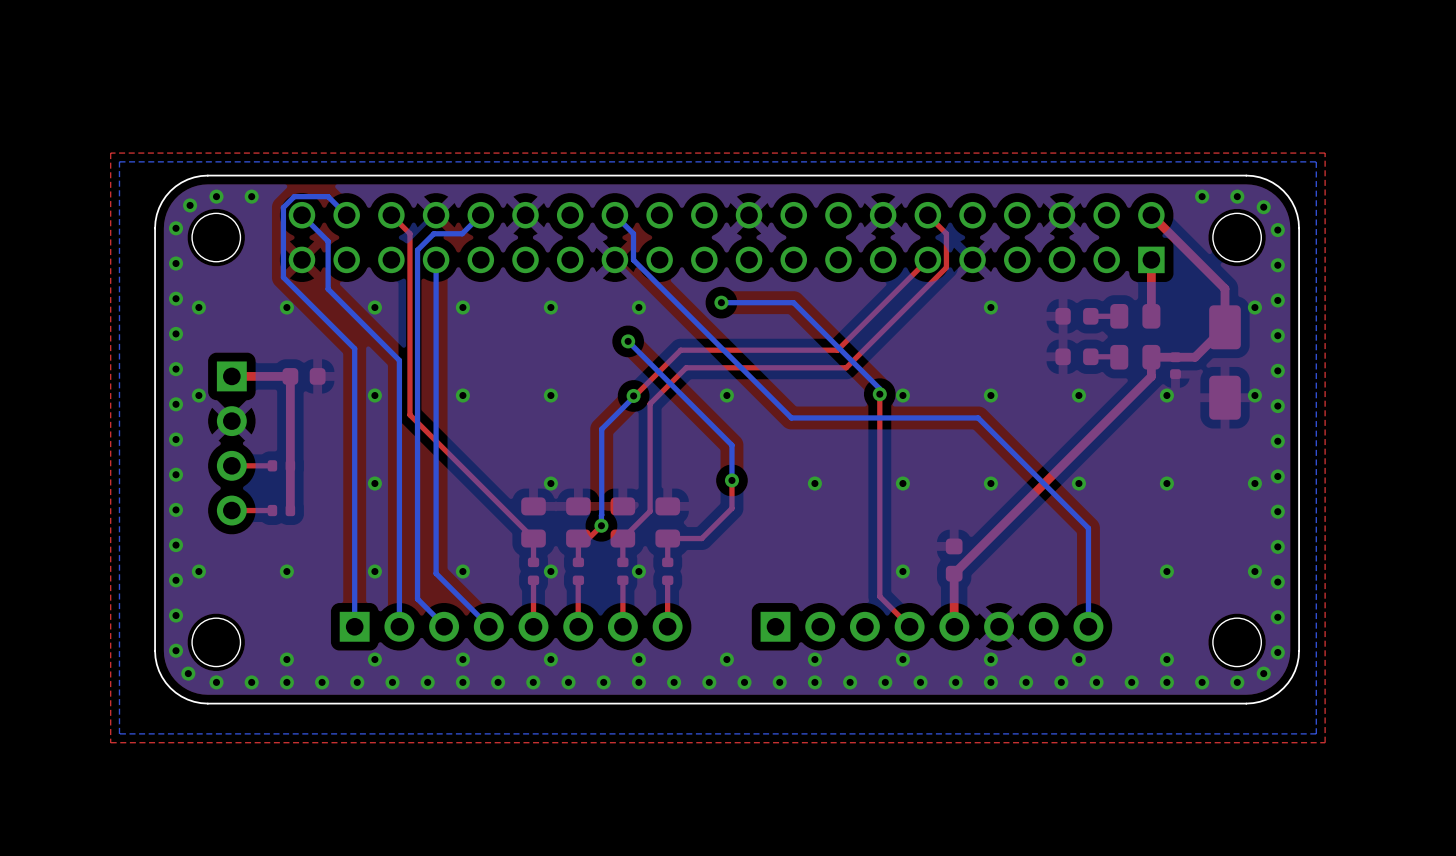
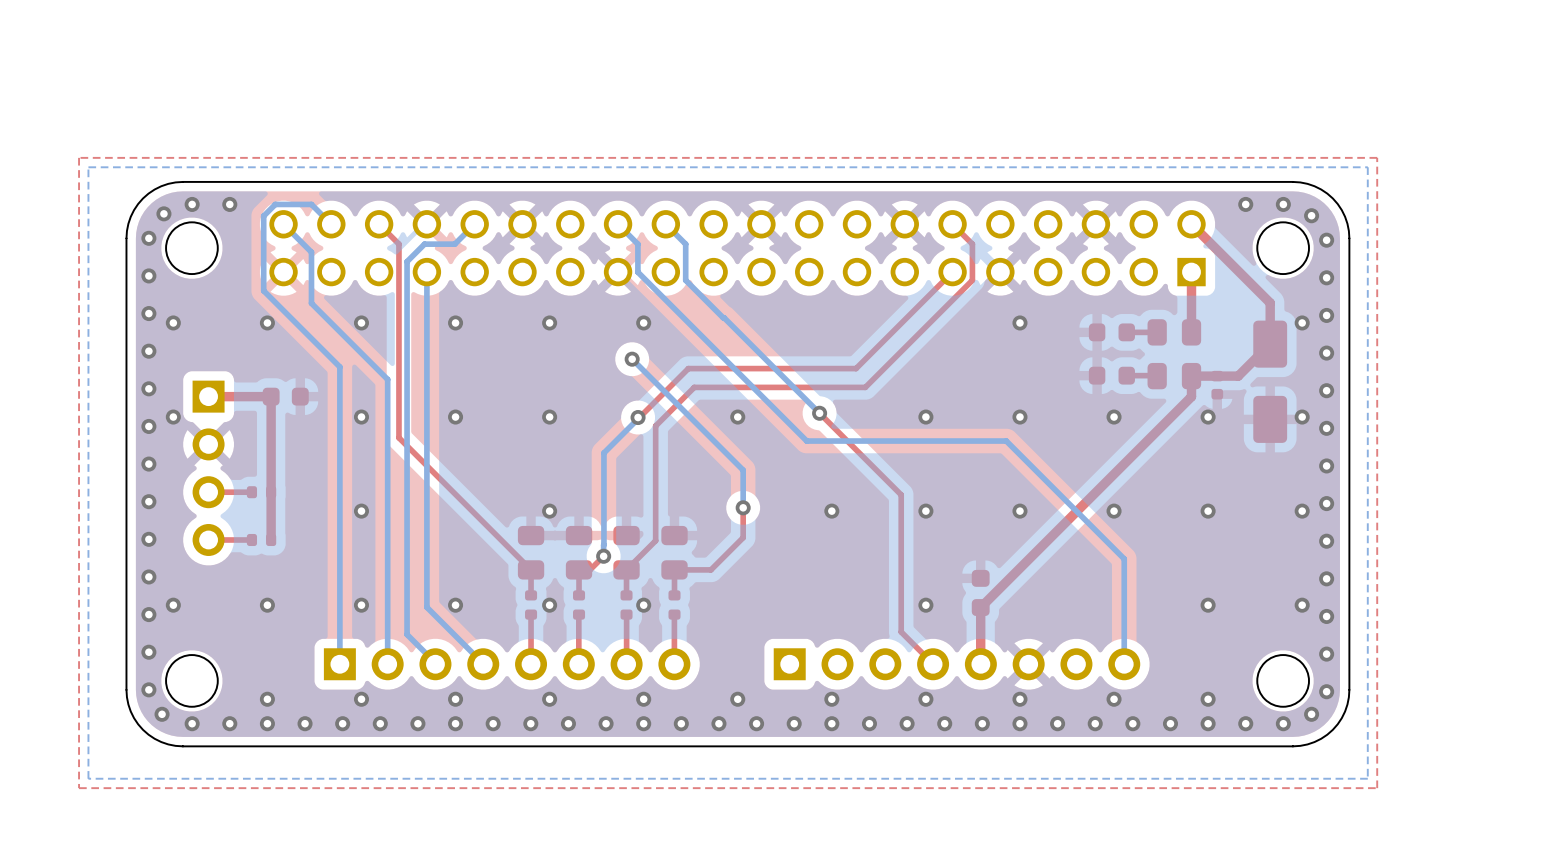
bottom track: none -> (665, 224) (685, 244) (685, 280) (819, 413)
bottom track: (721, 302) (793, 302) (879, 388) (879, 394) -> none
via: (721, 302) -> none
via: none -> (819, 413)
top track: (879, 394) (879, 468) -> (819, 413) (901, 494)
via: (879, 394) -> none

